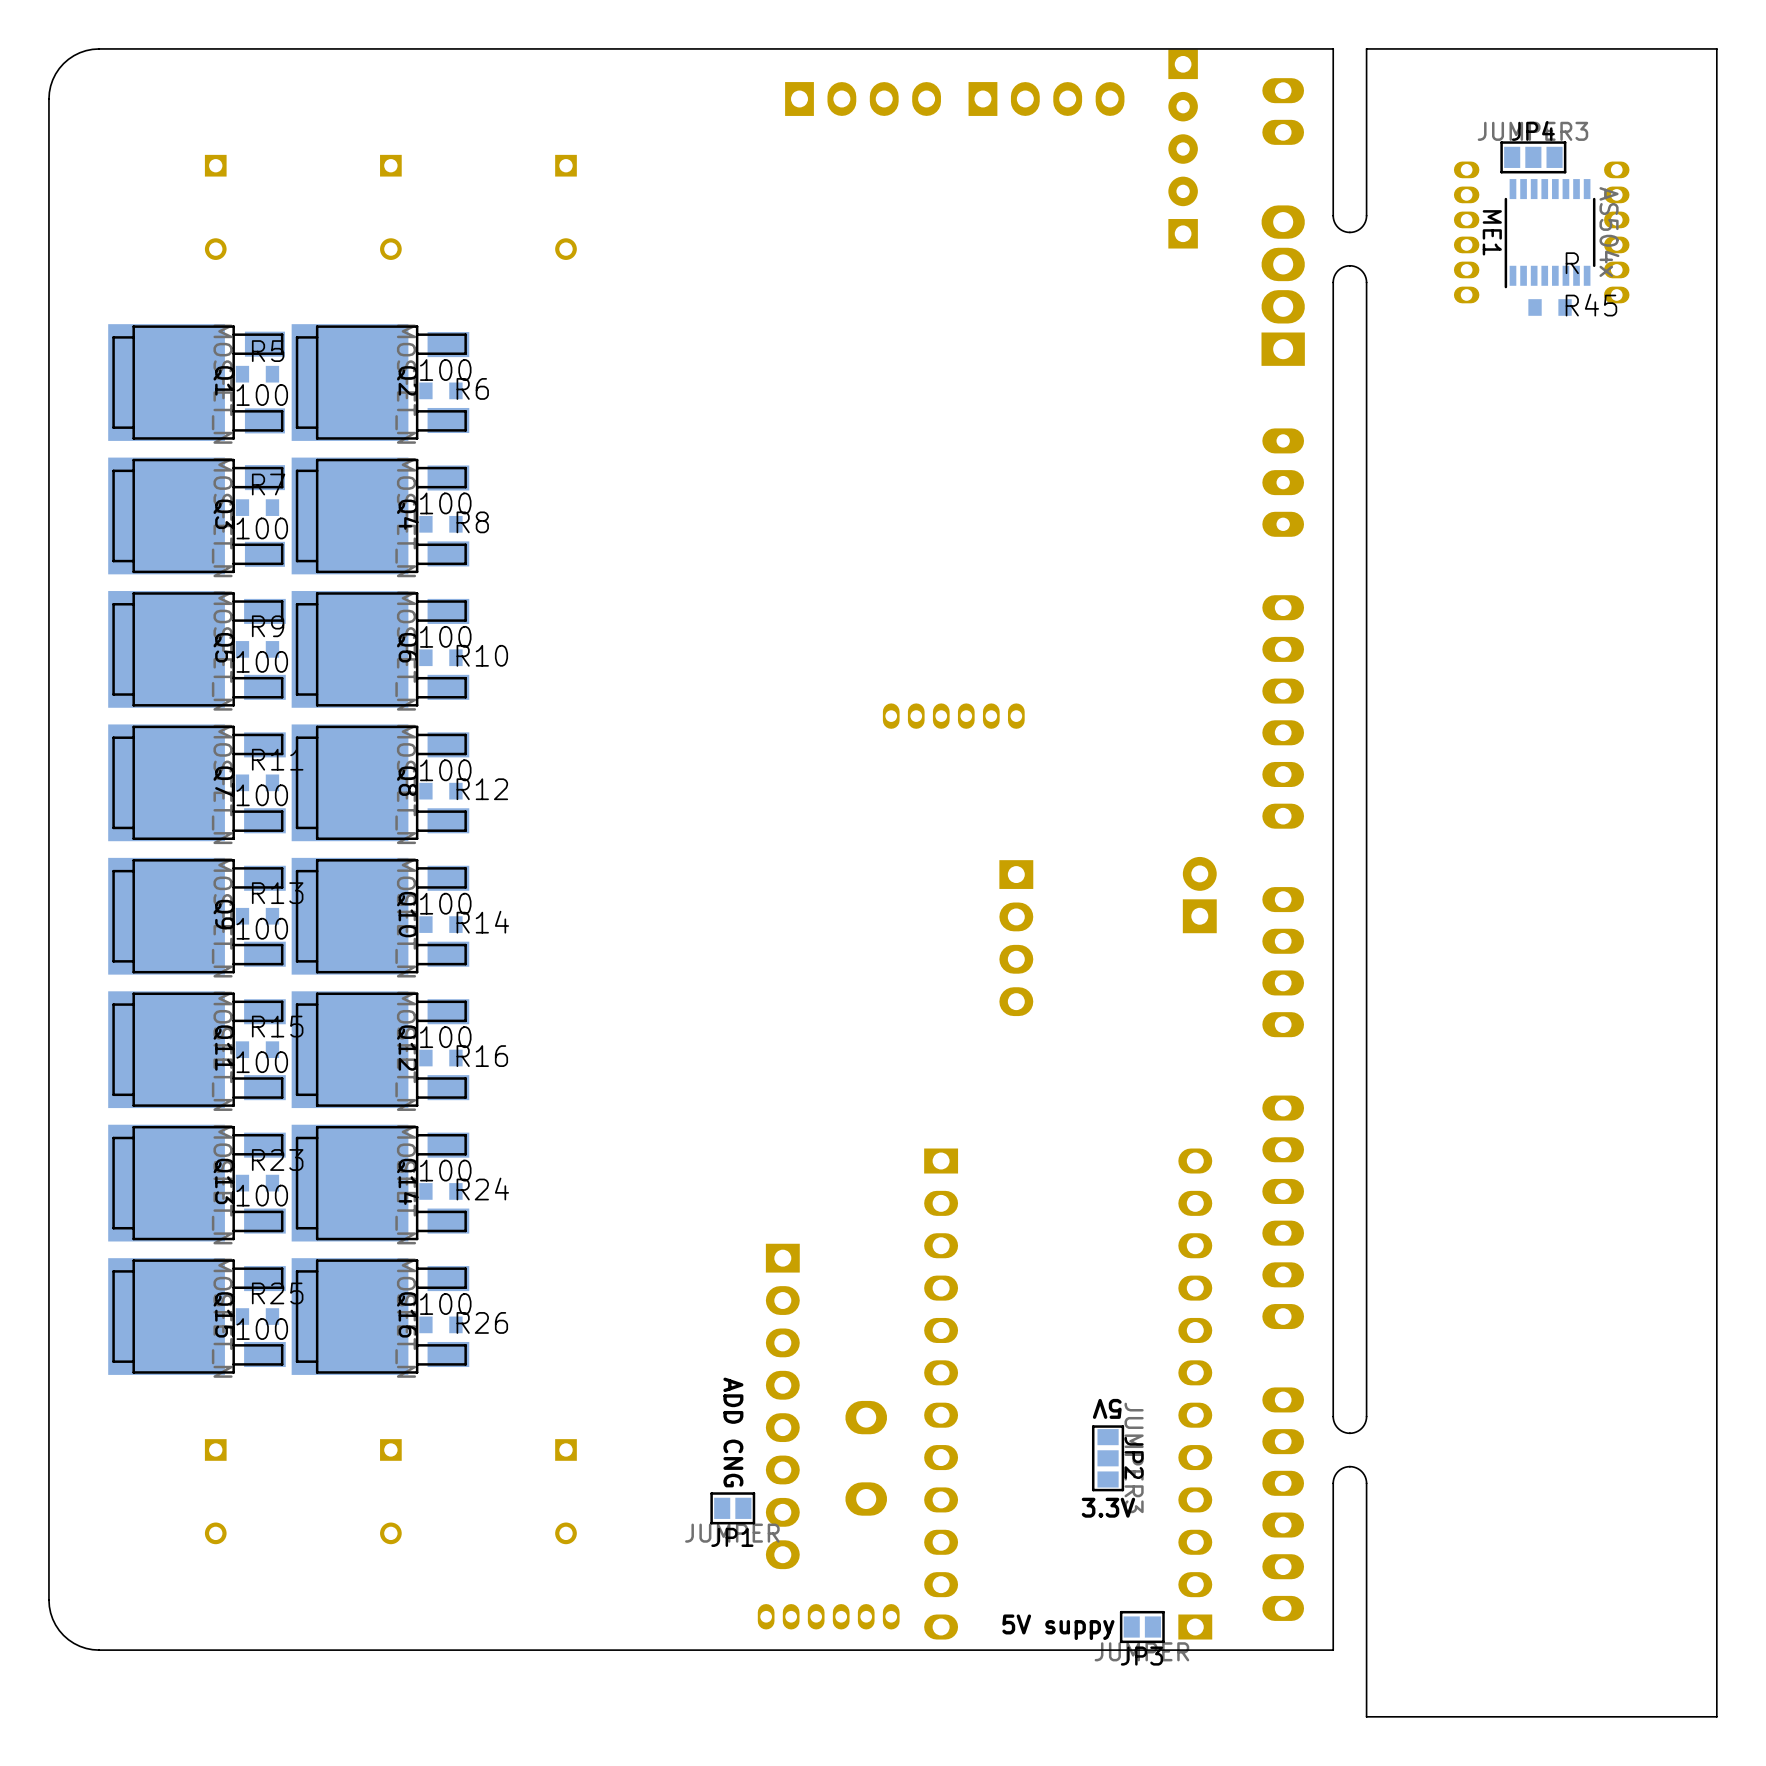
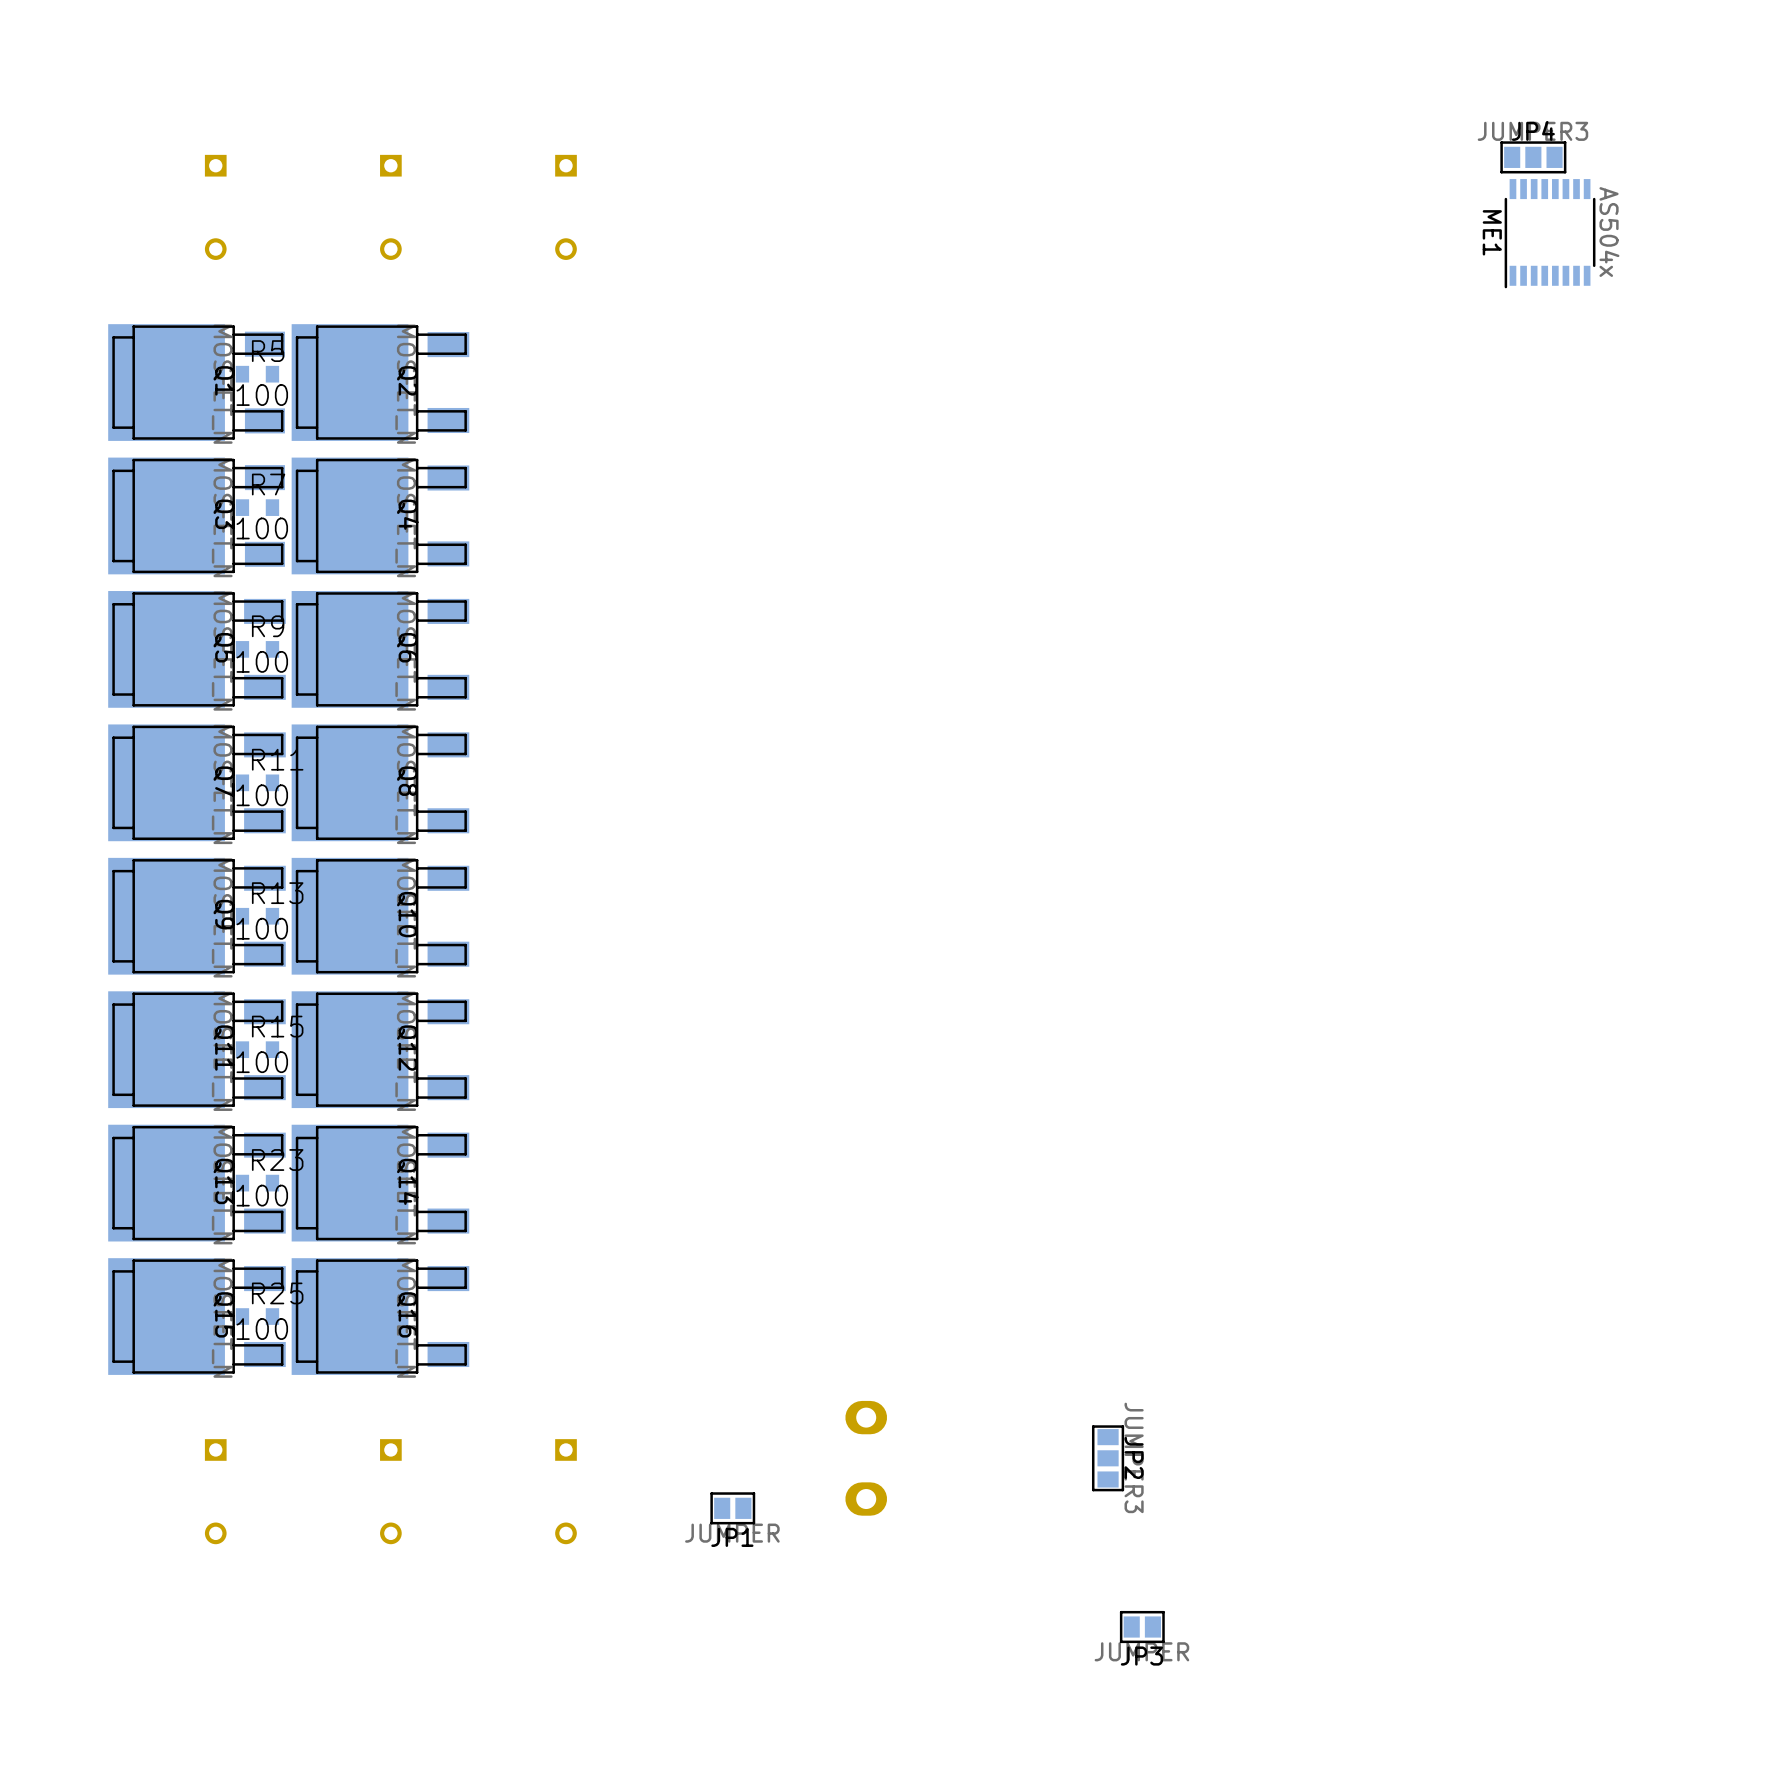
board edge: (1716, 48) (1716, 1716) (1366, 1716) (1366, 1481) (1361, 1471) (1349, 1466) (1338, 1471) (1333, 1481) (1333, 1650) (99, 1650) (79, 1646) (63, 1635) (52, 1619) (48, 1600) (48, 99) (52, 79) (63, 63) (79, 52) (99, 48) (1333, 48) (1333, 217) (1338, 227) (1349, 232) (1361, 227) (1366, 217) (1366, 48) (1716, 48) -> none
part: (863, 99) -> none
part: (1046, 99) -> none
part: (1283, 111) -> none
part: (1183, 149) -> none
part: (1466, 232) -> none
part: (1616, 232) -> none
board edge: (1349, 265) (1338, 270) (1333, 282) (1333, 1416) (1338, 1428) (1349, 1433) (1361, 1428) (1366, 1416) (1366, 282) (1361, 270) (1349, 265) -> none
part: (1283, 285) -> none
R45: R (1550, 307) -> none
R6: 100 (440, 390) -> none
part: (1283, 482) -> none
R8: 100 (440, 524) -> none
R10: 100 (440, 657) -> none
part: (1283, 711) -> none
part: (953, 716) -> none
R12: 100 (440, 791) -> none
part: (1199, 895) -> none
R14: 100 (440, 924) -> none
part: (1016, 938) -> none
part: (1283, 962) -> none
R16: 100 (440, 1058) -> none
R24: 100 (440, 1191) -> none
part: (1283, 1212) -> none
R26: 100 (440, 1324) -> none
part: (941, 1394) -> none
part: (1195, 1394) -> none
part: (782, 1406) -> none
text: 5V (1107, 1408) -> none
text: ADD CNG (733, 1432) -> none
part: (1283, 1504) -> none
text: 3.3V (1108, 1507) -> none
part: (828, 1616) -> none
text: 5V suppy (1058, 1627) -> none

